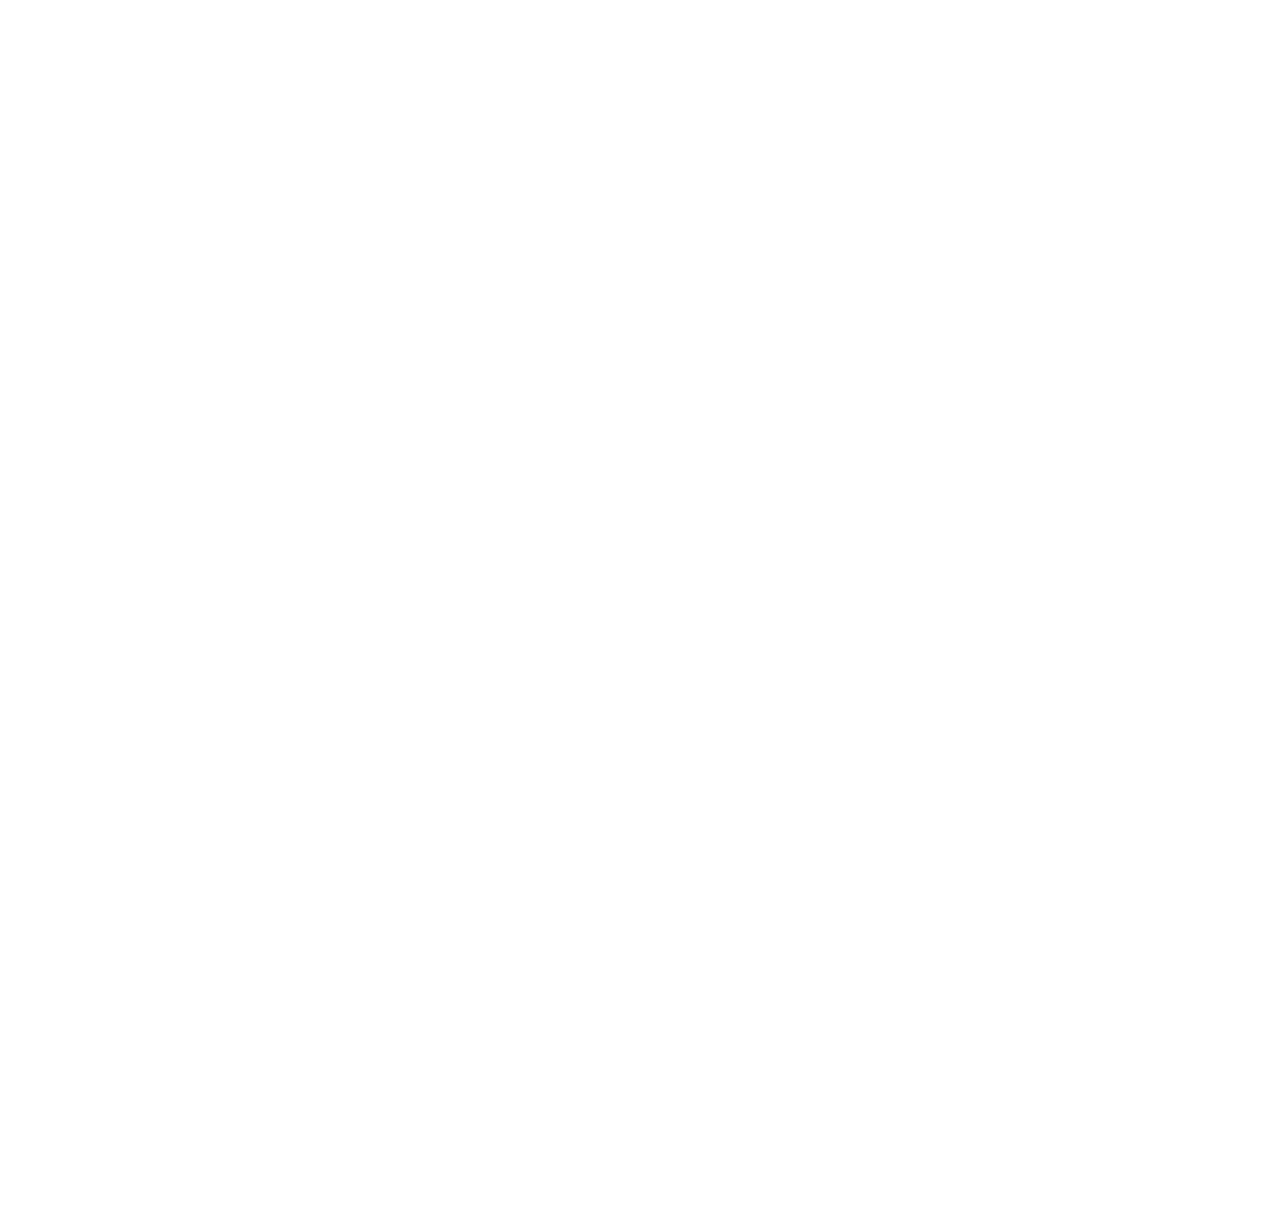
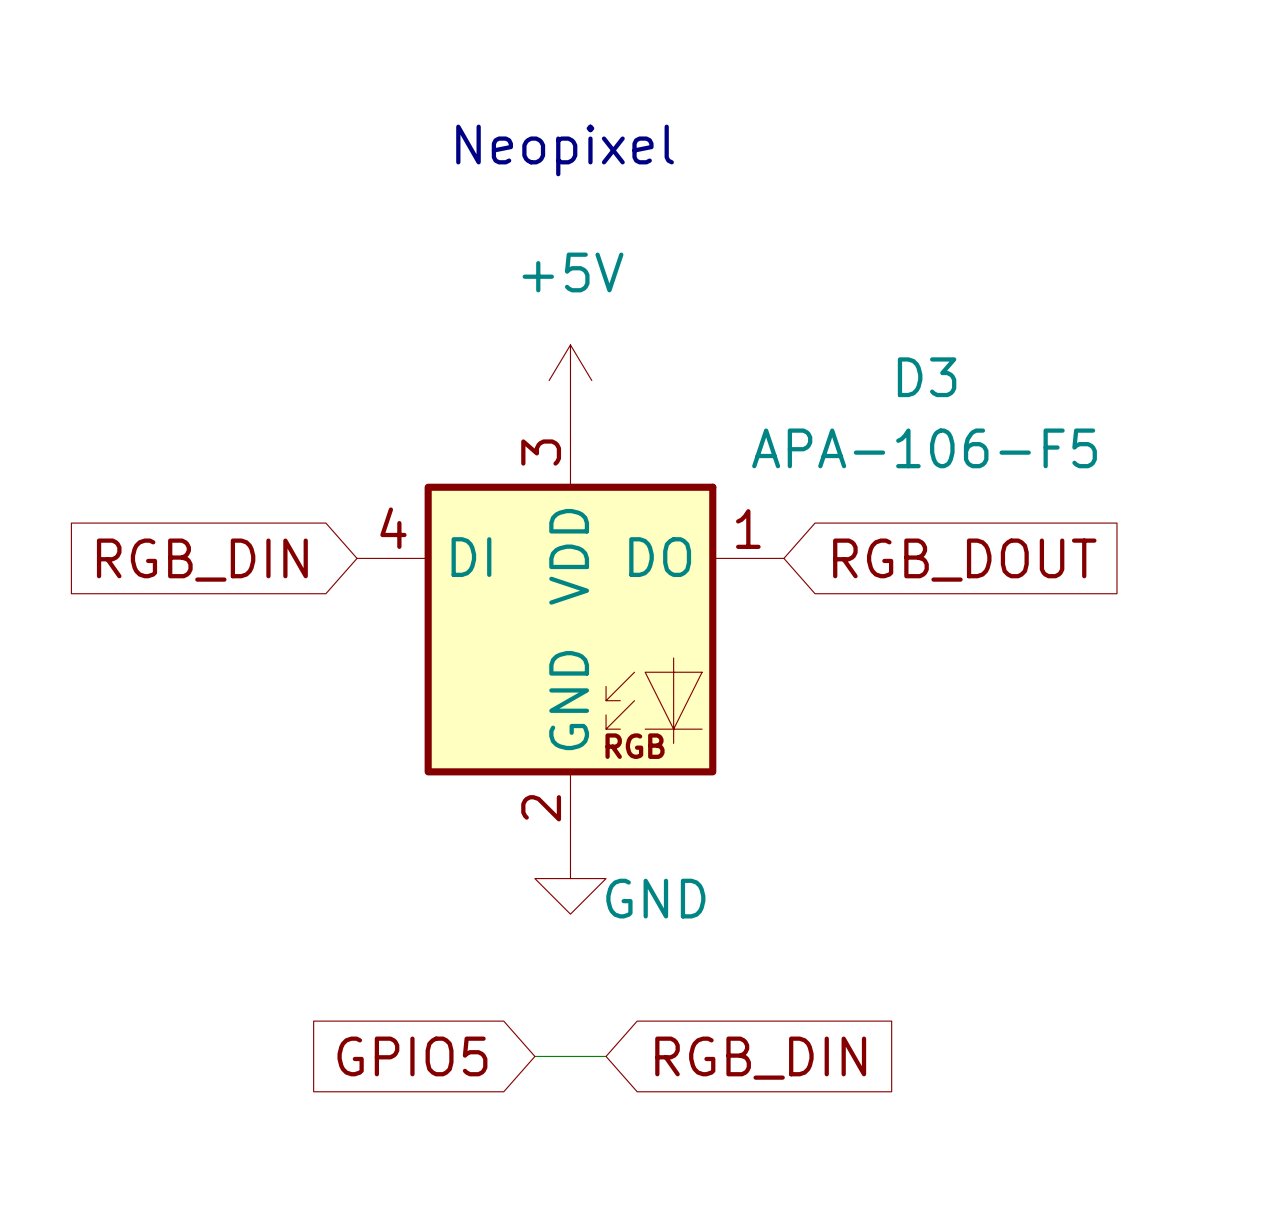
text: none -> Neopixel (565, 150)
power symbol: none -> +5V (570, 380)
global label: none -> RGB_DIN (202, 560)
global label: none -> RGB_DOUT (964, 560)
D3: none -> APA-106-F5 (570, 629)
power symbol: none -> GND (570, 878)
global label: none -> GPIO5 (412, 1056)
wire: none -> (534, 1056) (606, 1056)
global label: none -> RGB_DIN (760, 1058)

